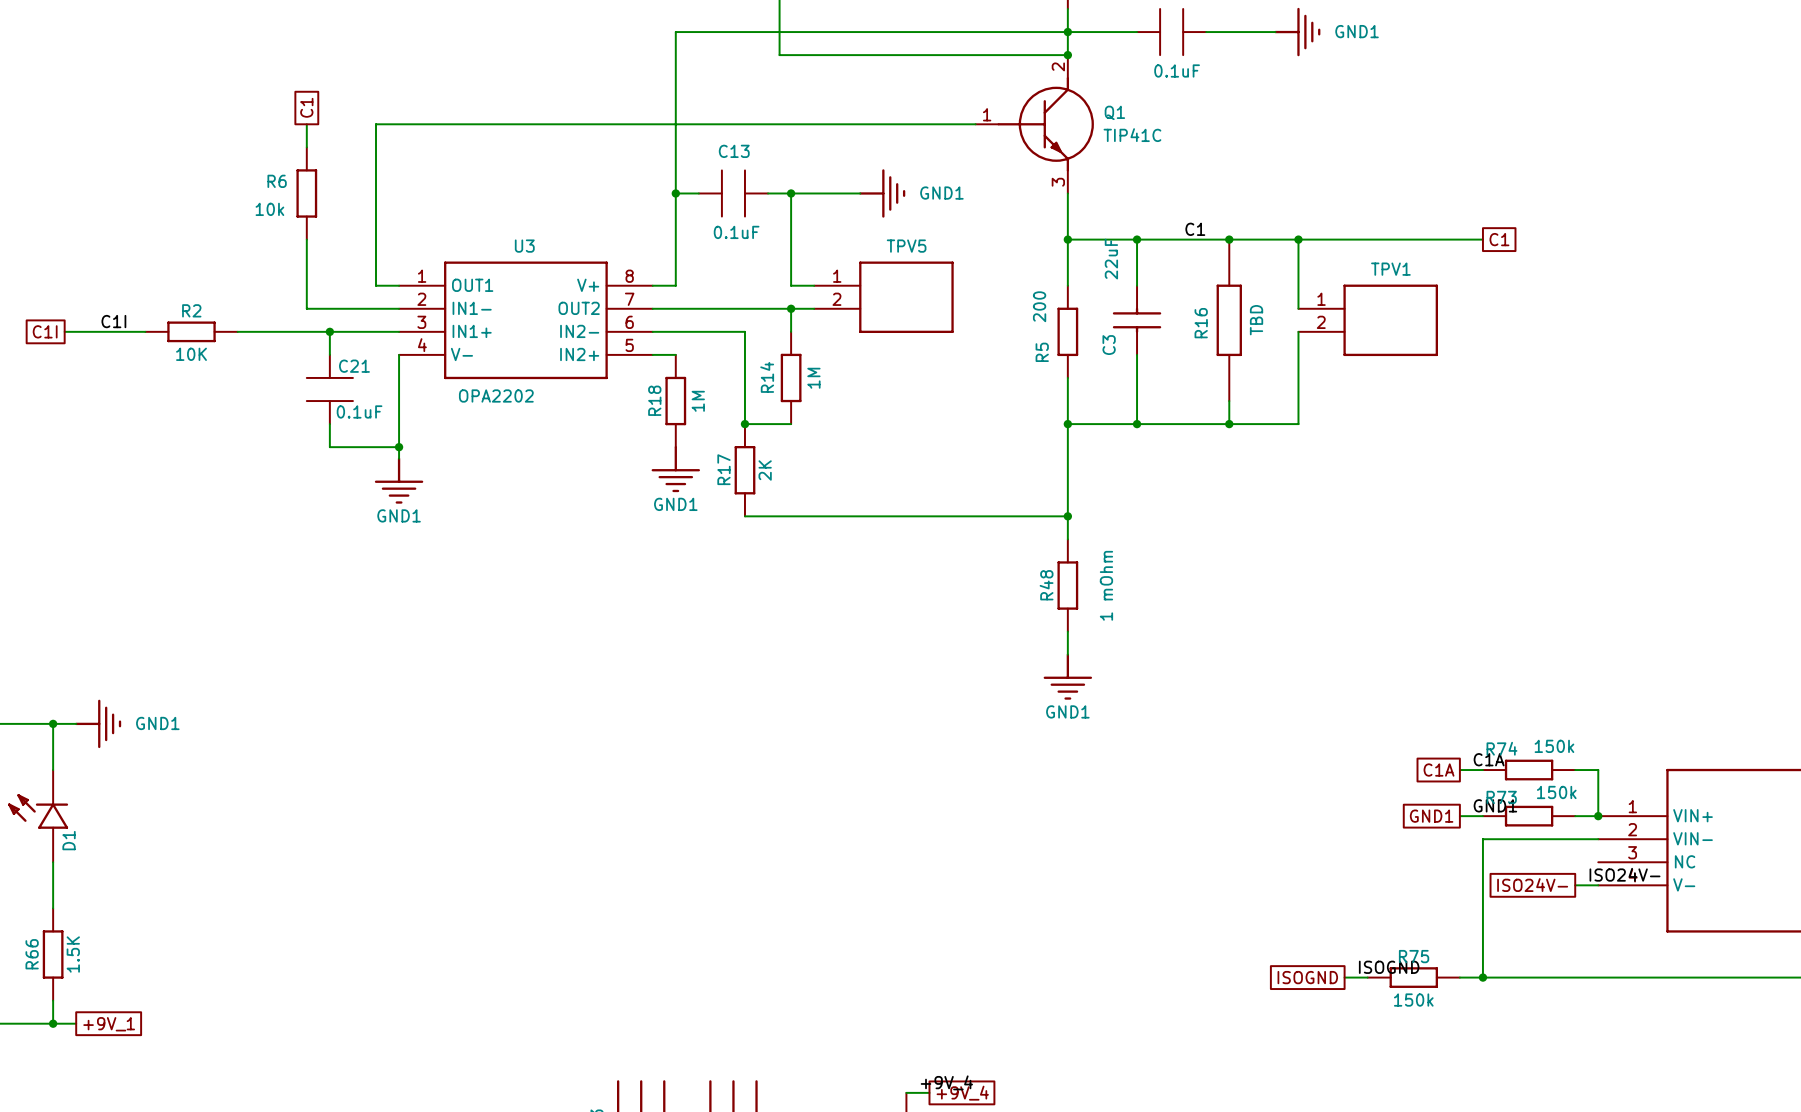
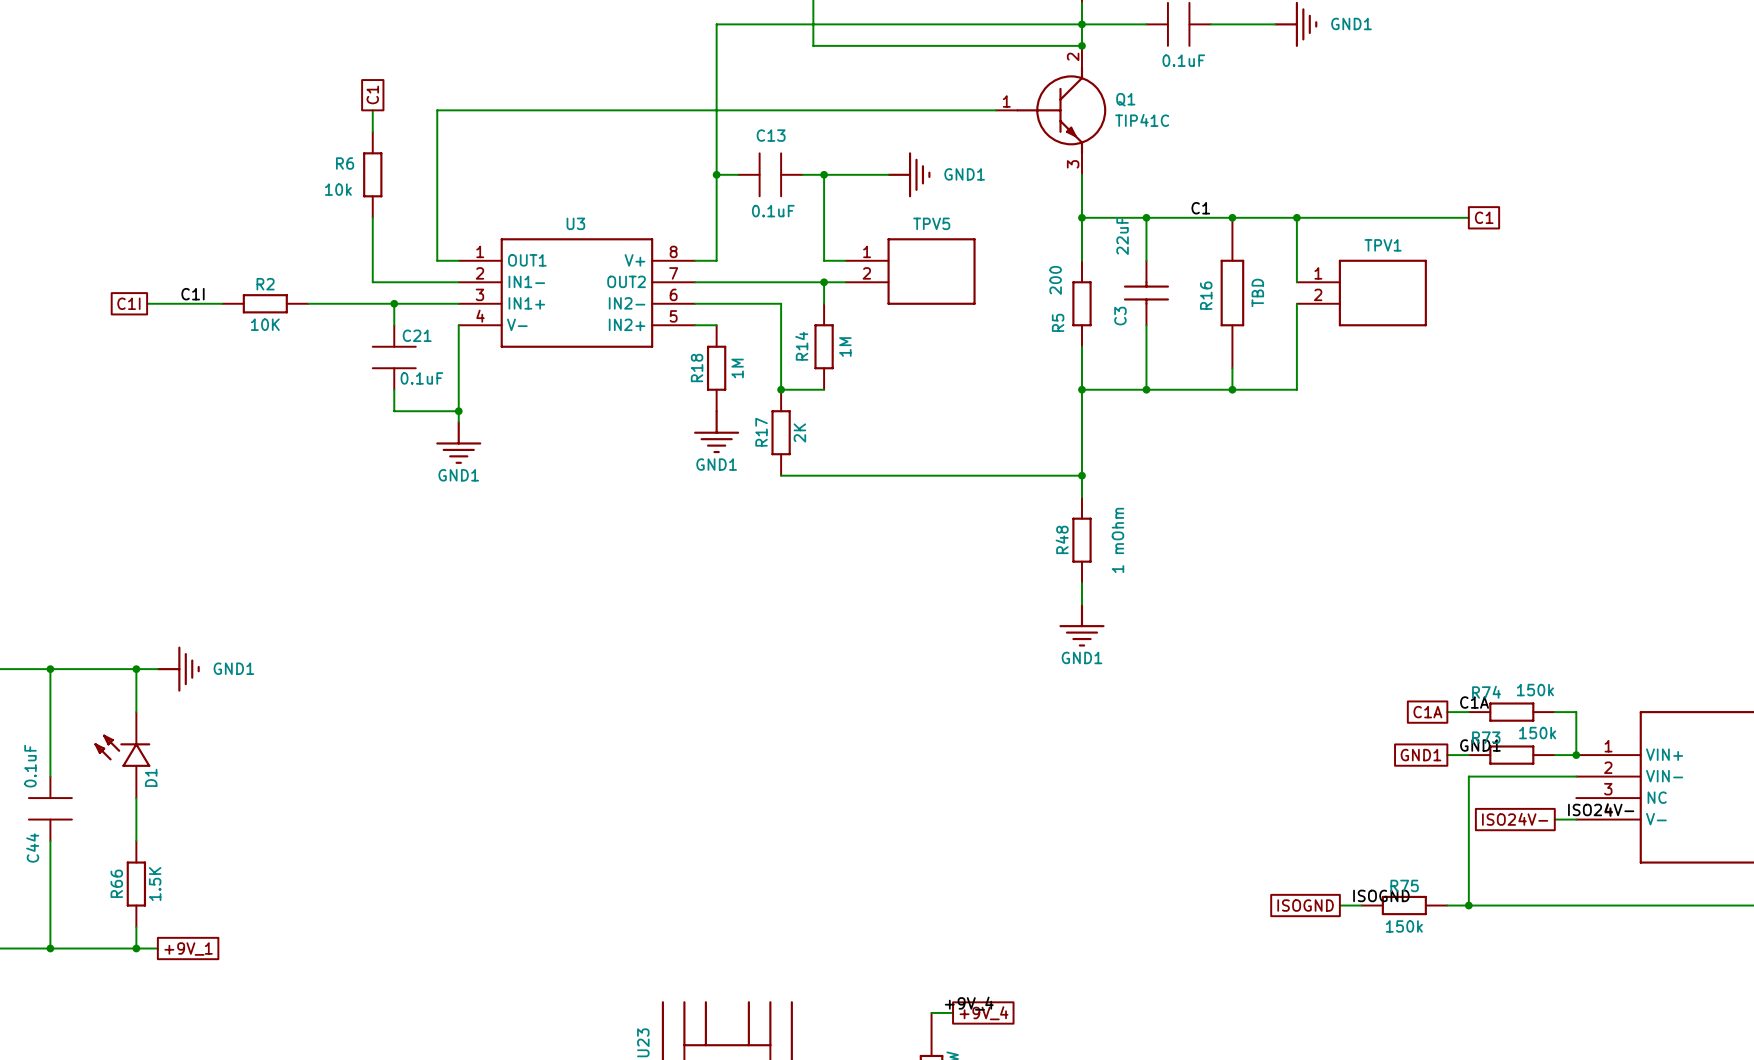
U3 value: OPA2202 (496, 395) -> none

